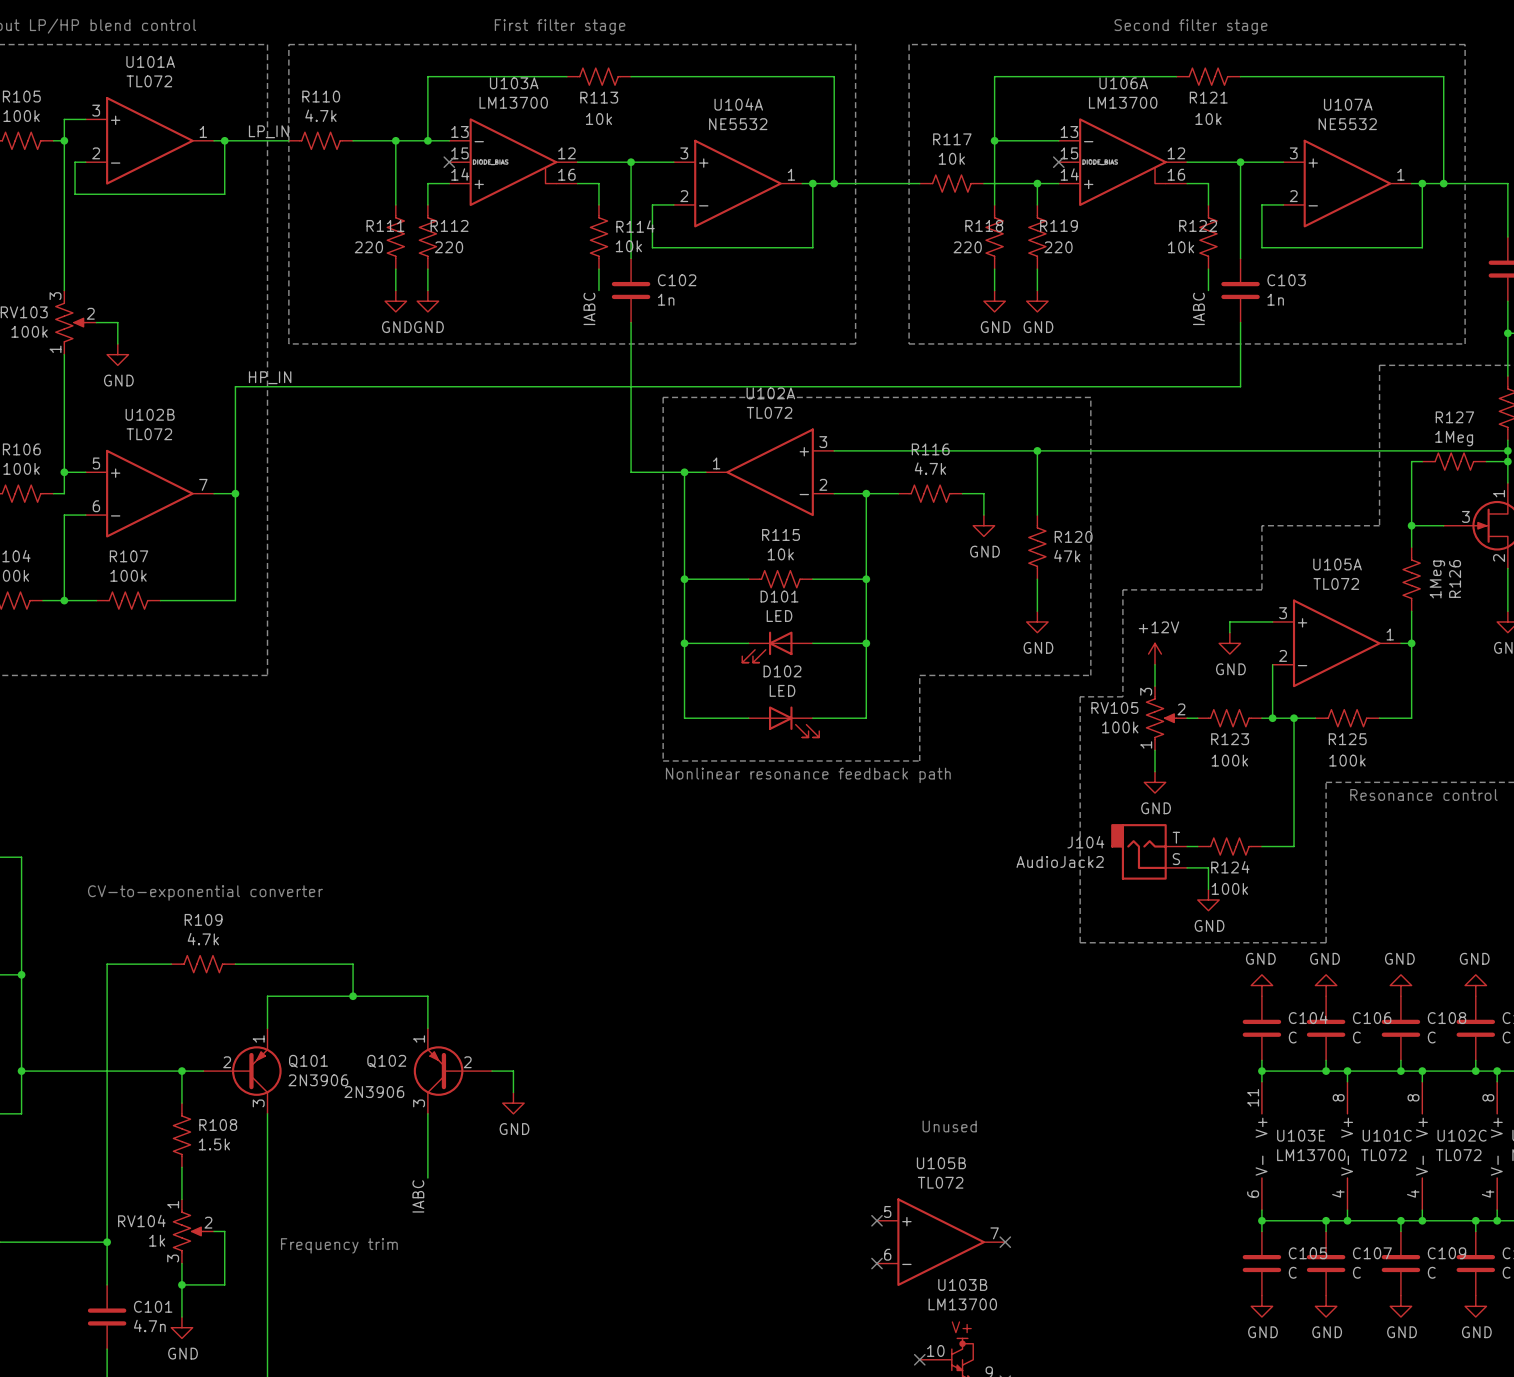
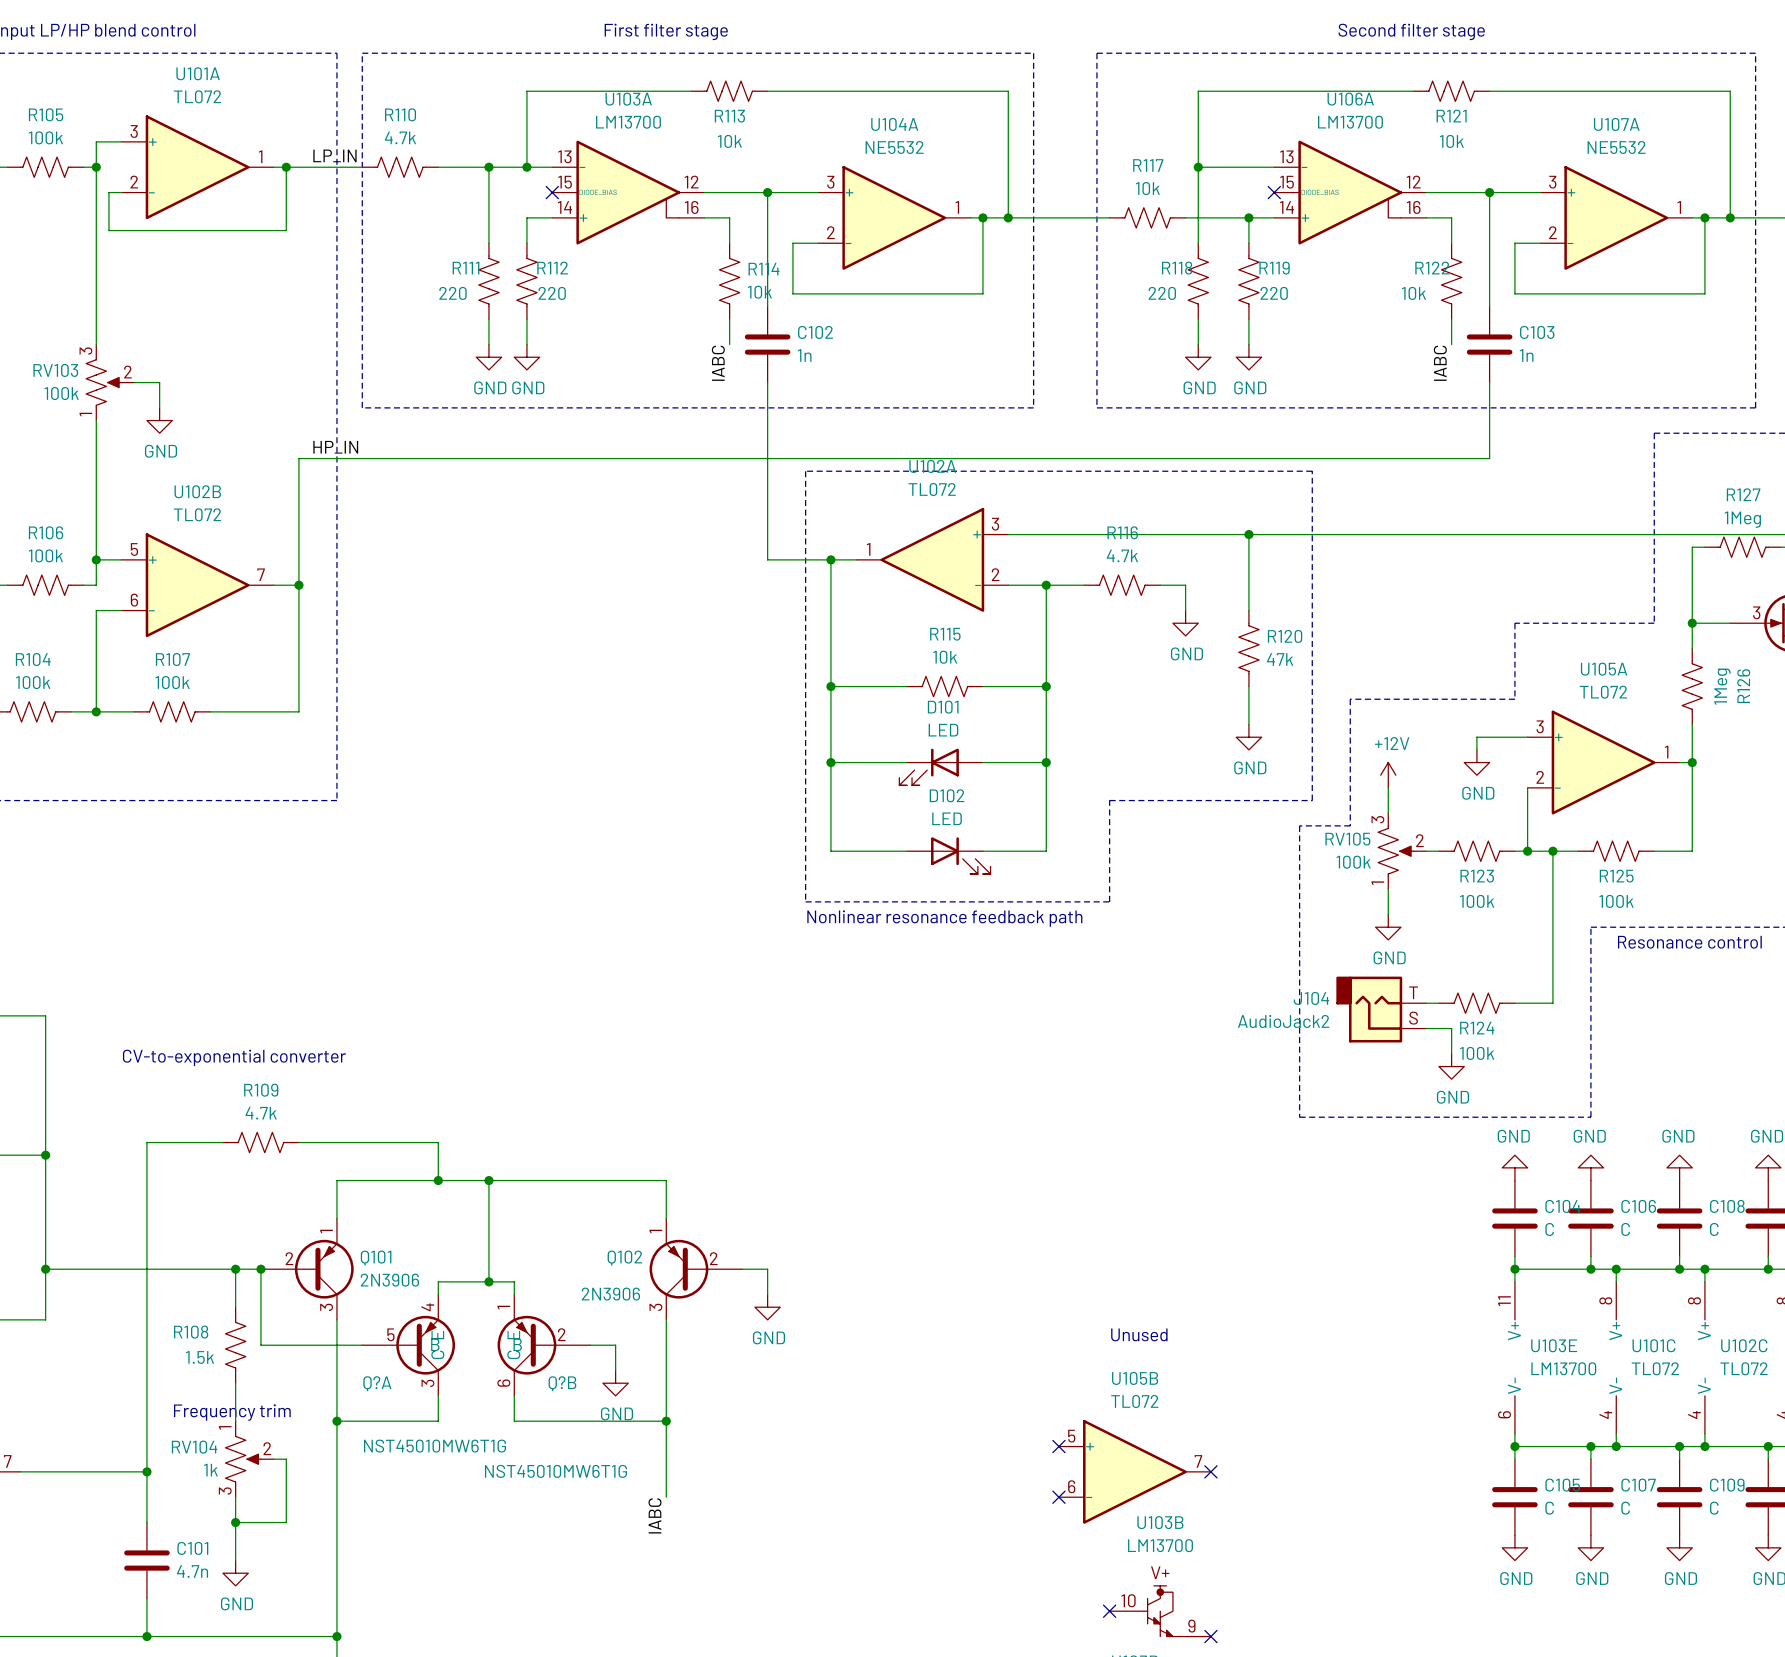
wire: none -> (488, 1180) (488, 1281)
junction: none -> (488, 1180)
wire: (427, 996) (427, 1028) -> (526, 1180) (666, 1180) (666, 1218)
wire: none -> (260, 1269) (260, 1345) (362, 1345)
junction: none -> (260, 1269)
Q102 position: (452, 1071) -> (695, 1269)
wire: (492, 1071) (513, 1071) (513, 1092) -> (590, 1345) (615, 1345) (615, 1370)
wire: none -> (742, 1269) (767, 1269) (767, 1294)
junction: none -> (488, 1281)
wire: none -> (438, 1294) (438, 1281) (514, 1281) (514, 1294)
power symbol: GND (513, 1103) -> none
power symbol: none -> GND (767, 1307)
wire: (427, 1113) (427, 1178) -> none
wire: none -> (666, 1319) (666, 1497)
R108 name position: R108 (218, 1125) -> R108 (191, 1332)
Q?A: none -> NST45010MW6T1G (408, 1345)
Q?B: none -> NST45010MW6T1G (543, 1345)
R108 value position: 1.5k (214, 1144) -> 1.5k (200, 1357)
power symbol: none -> GND (615, 1383)
wire: none -> (438, 1395) (438, 1421) (336, 1421)
wire: none -> (514, 1395) (514, 1421) (666, 1421)
label position: IABC (418, 1196) -> IABC (655, 1515)
junction: none -> (336, 1421)
junction: none -> (666, 1421)
text position: Frequency trim (339, 1245) -> Frequency trim (232, 1412)

